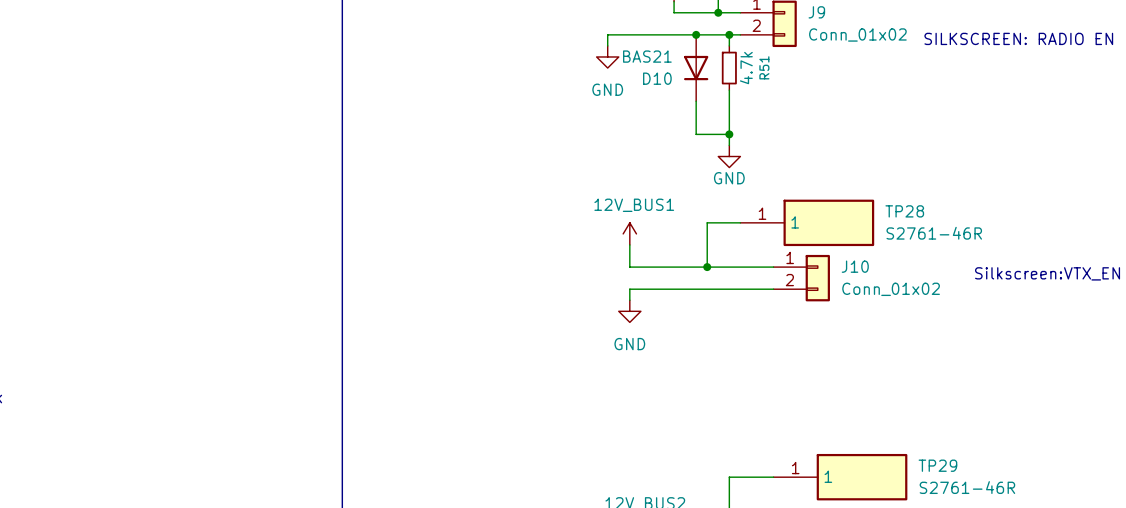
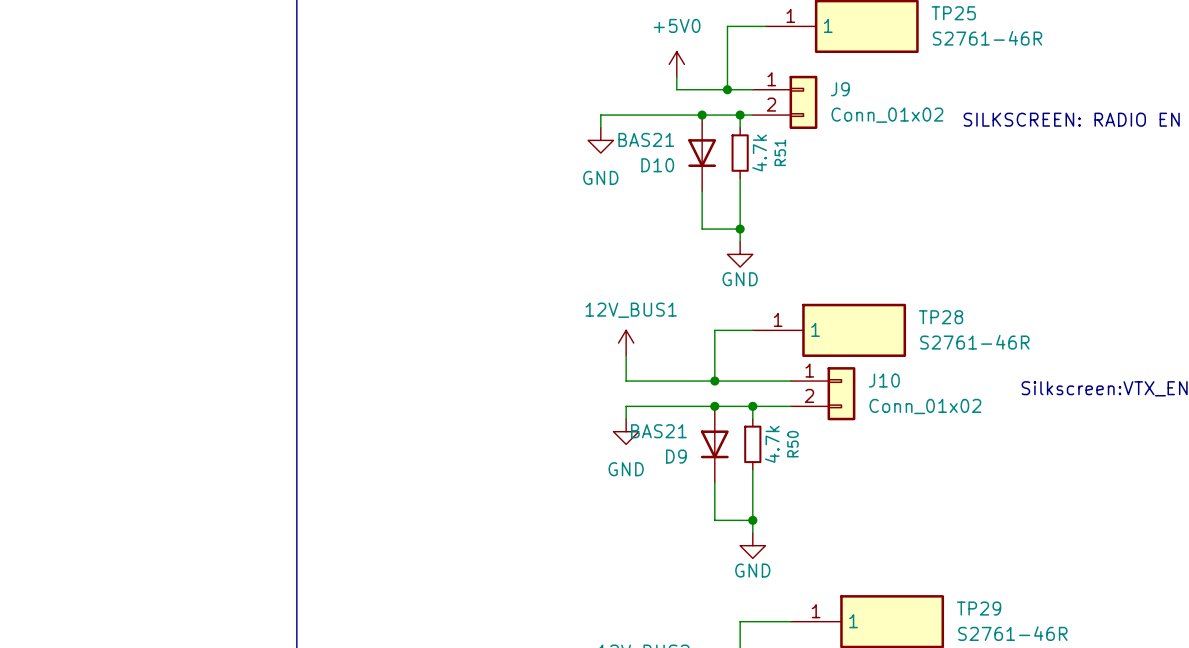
junction: none -> (714, 406)
wire: none -> (752, 406) (752, 419)
junction: none -> (752, 406)
D9: none -> BAS21 (714, 444)
R50: none -> 4.7k (752, 444)
wire: none -> (752, 469) (752, 533)
wire: none -> (714, 482) (714, 520) (752, 520)
junction: none -> (752, 520)
power symbol: none -> GND (752, 545)

